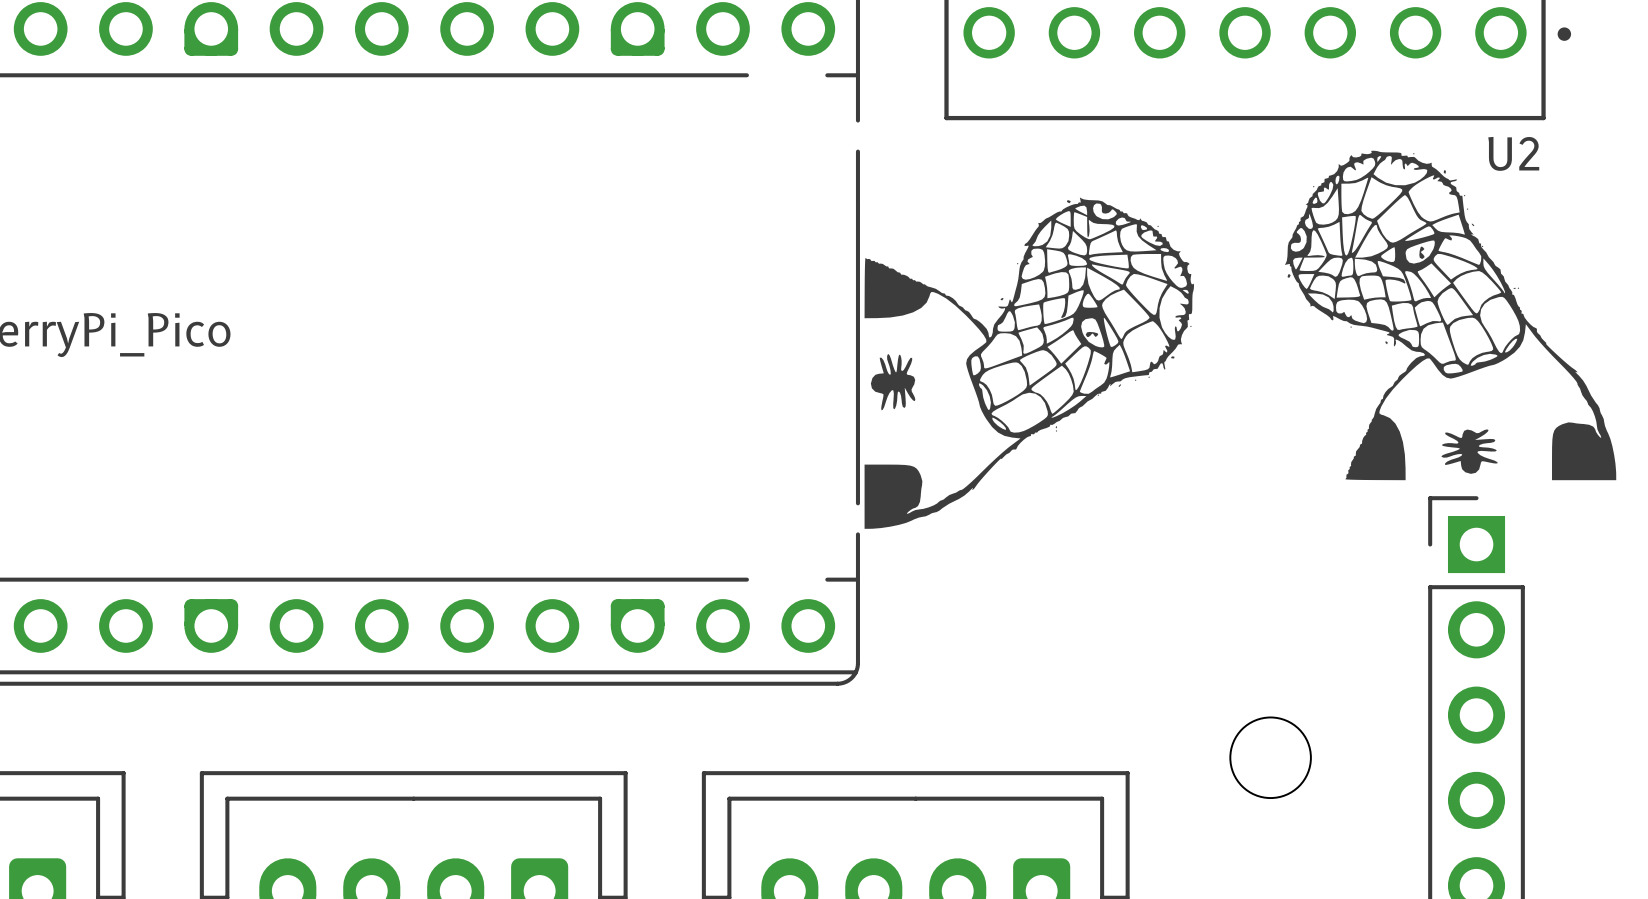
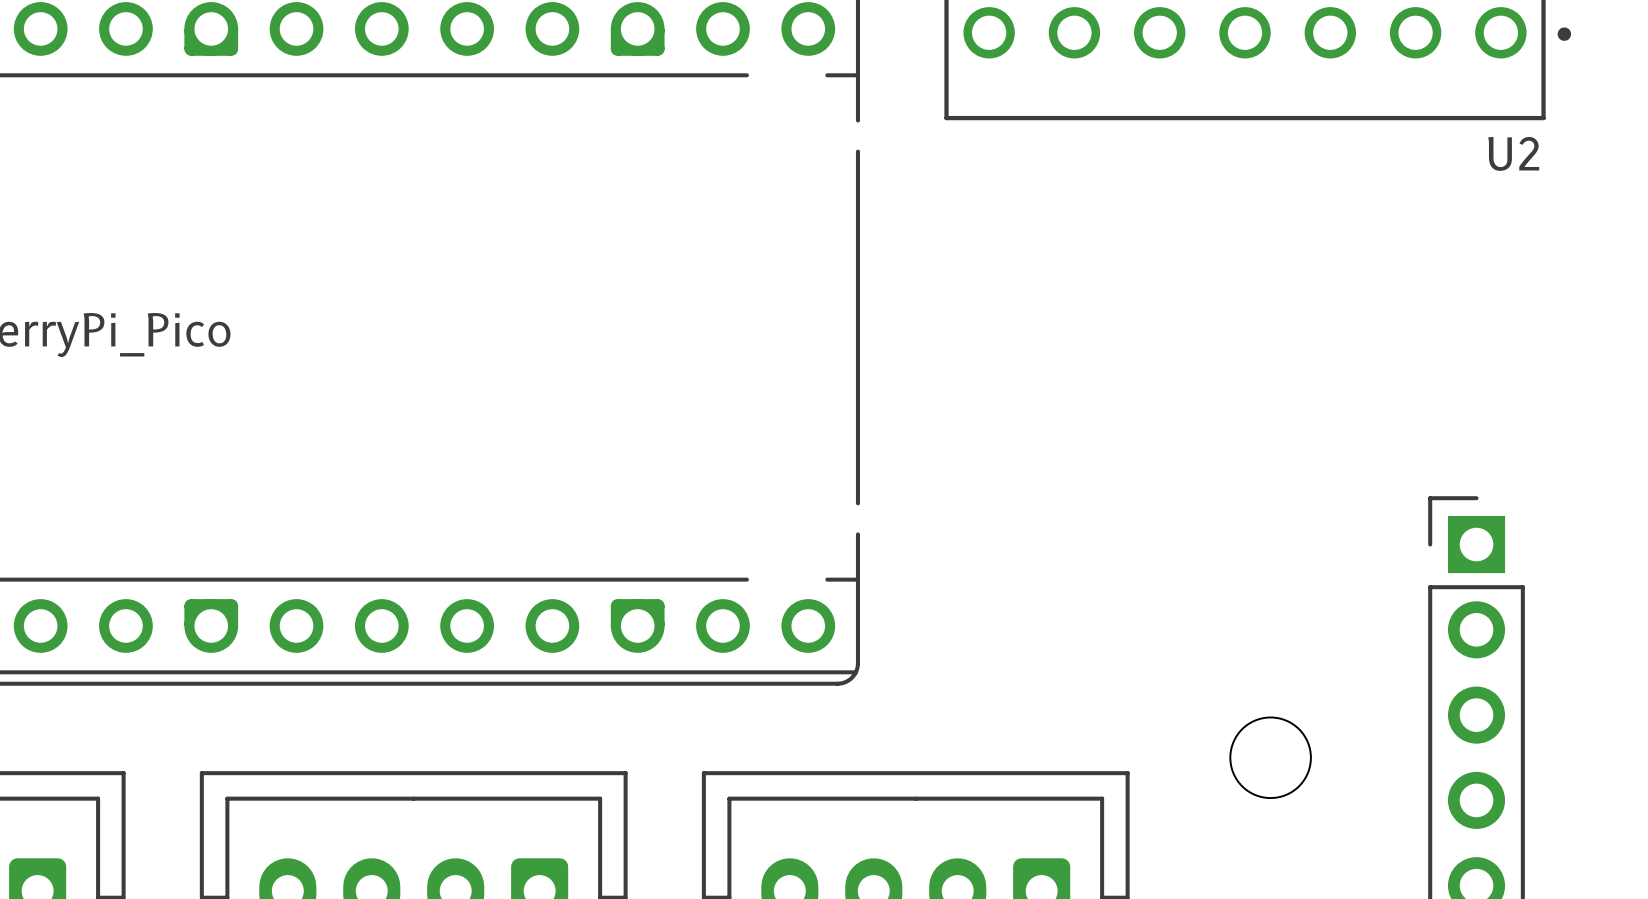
drawing: [1285, 150, 1617, 481] -> none
drawing: [864, 197, 1195, 529] -> none

